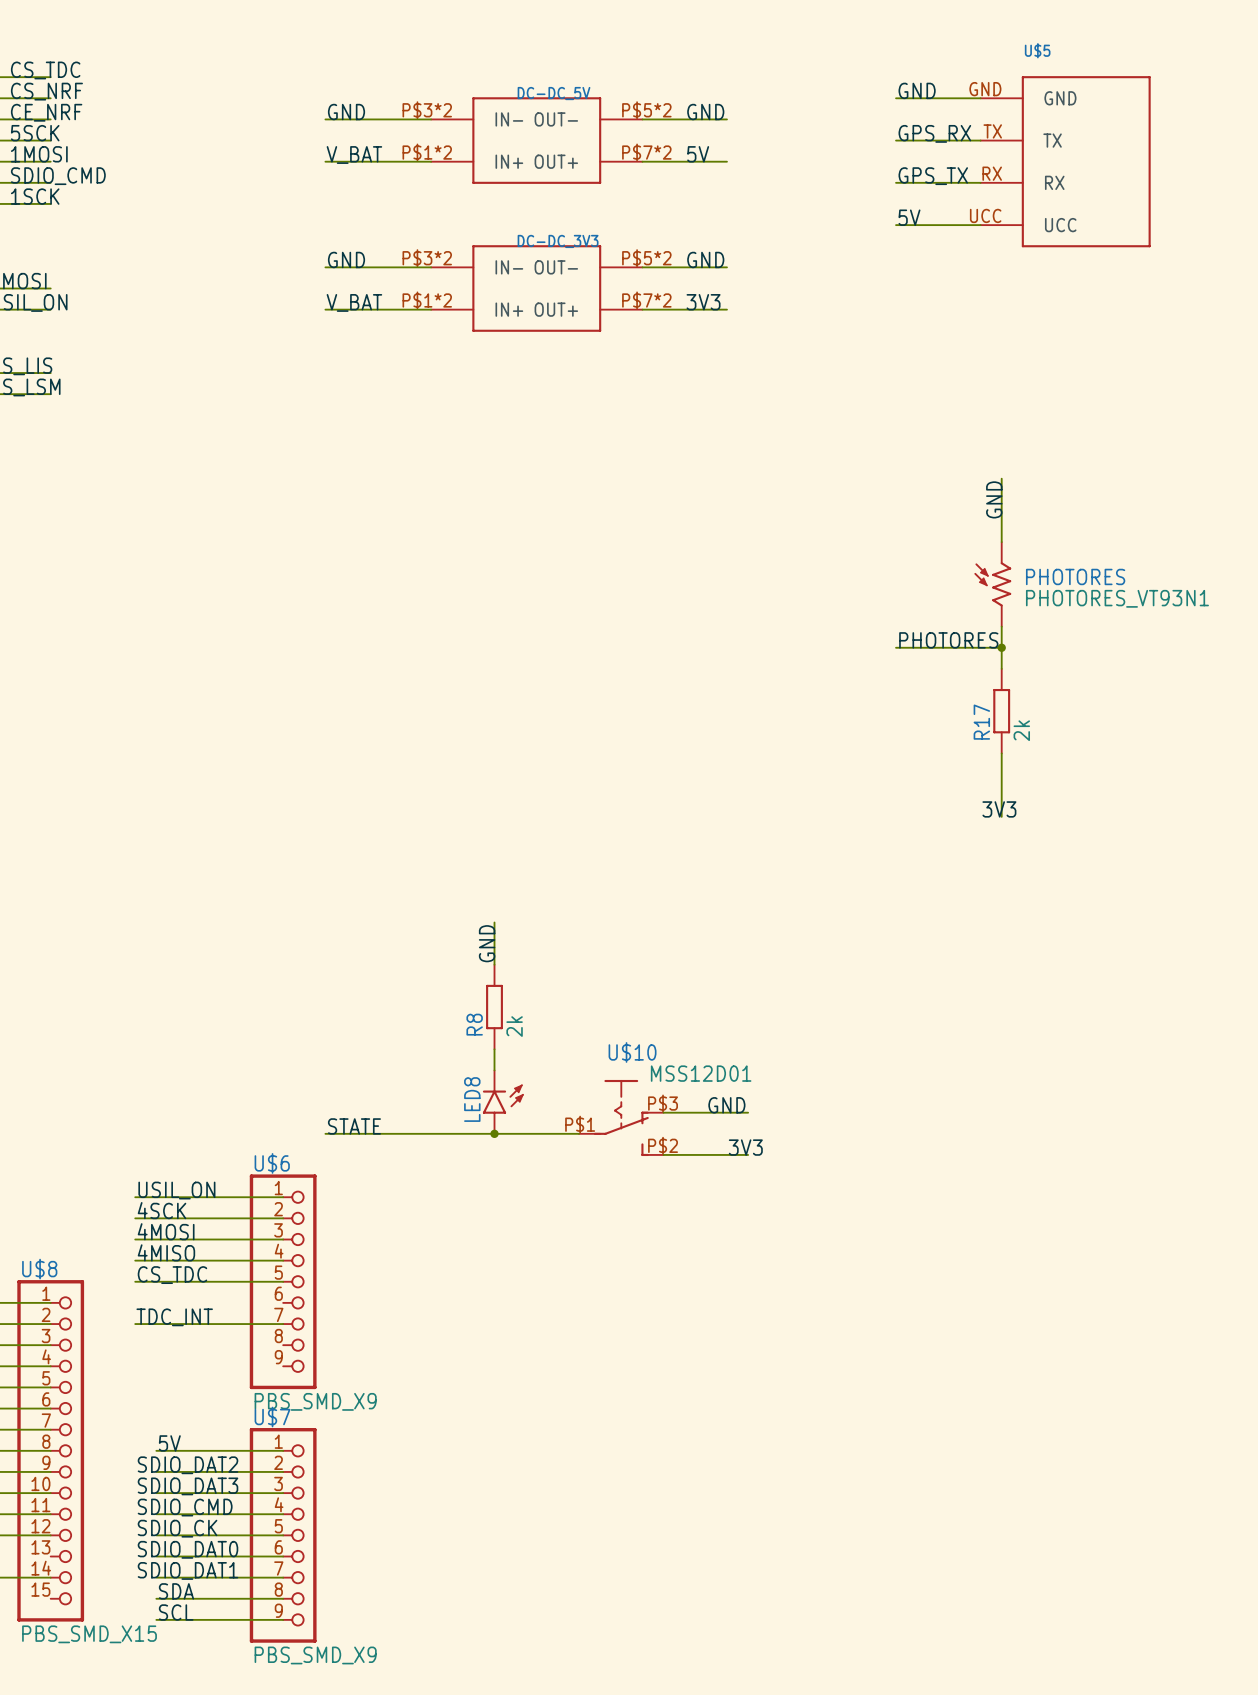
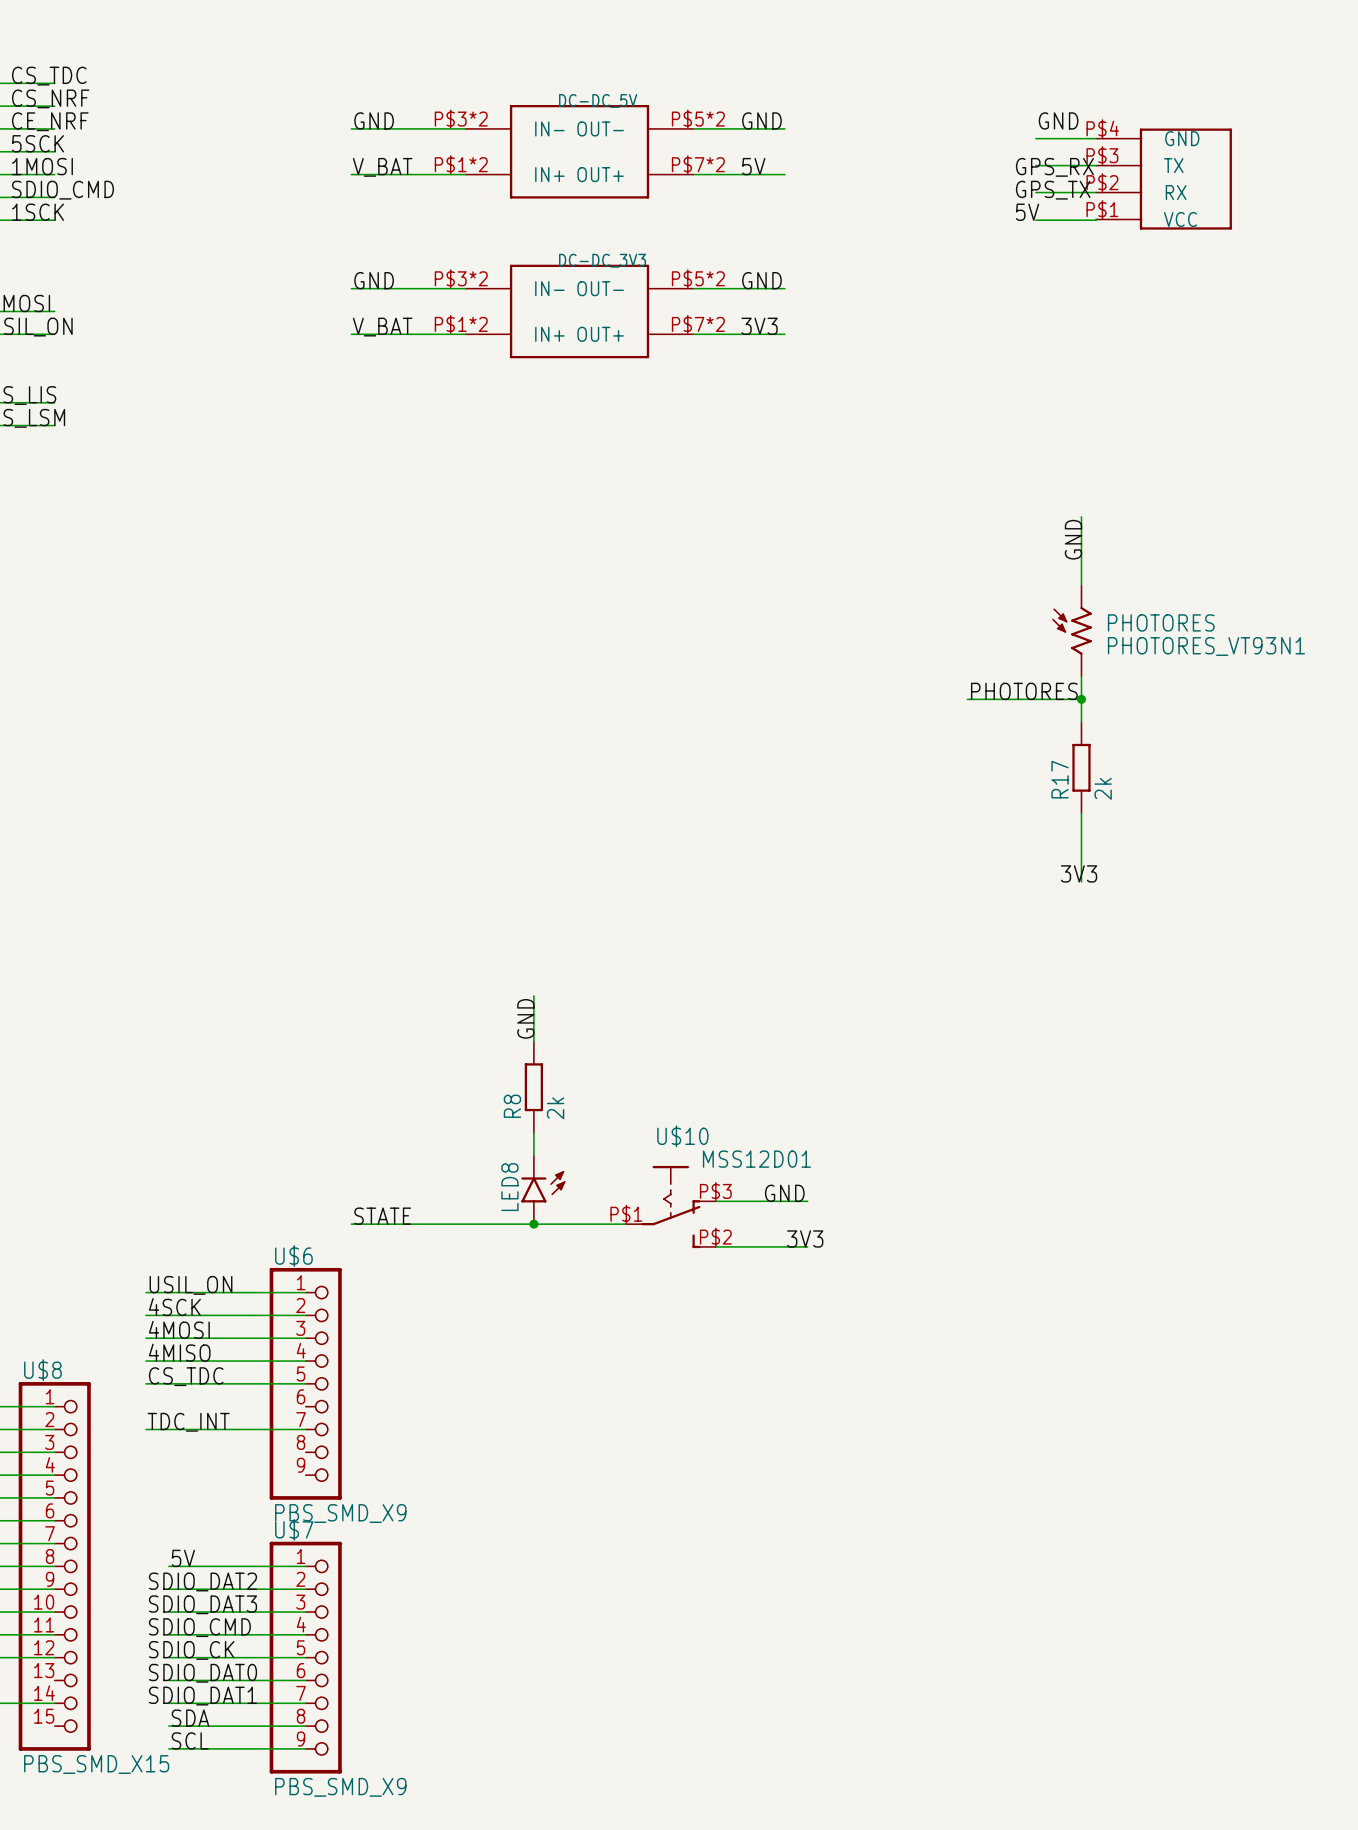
label position: GND (917, 90) -> GND (1058, 120)
wire: (896, 98) (980, 98) -> none
wire: none -> (1035, 138) (1096, 138)
label position: GPS_RX (934, 133) -> GPS_RX (1054, 167)
wire: (896, 140) (980, 140) -> none
wire: none -> (1035, 165) (1096, 165)
U$5: (1065, 161) -> none
part: none -> (1163, 179)
label position: GPS_TX (933, 176) -> GPS_TX (1053, 190)
wire: none -> (1035, 192) (1096, 192)
wire: (896, 182) (980, 182) -> none
wire: none -> (1096, 219) (1035, 220)
label position: 5V (909, 217) -> 5V (1027, 212)
wire: (896, 225) (980, 225) -> none

